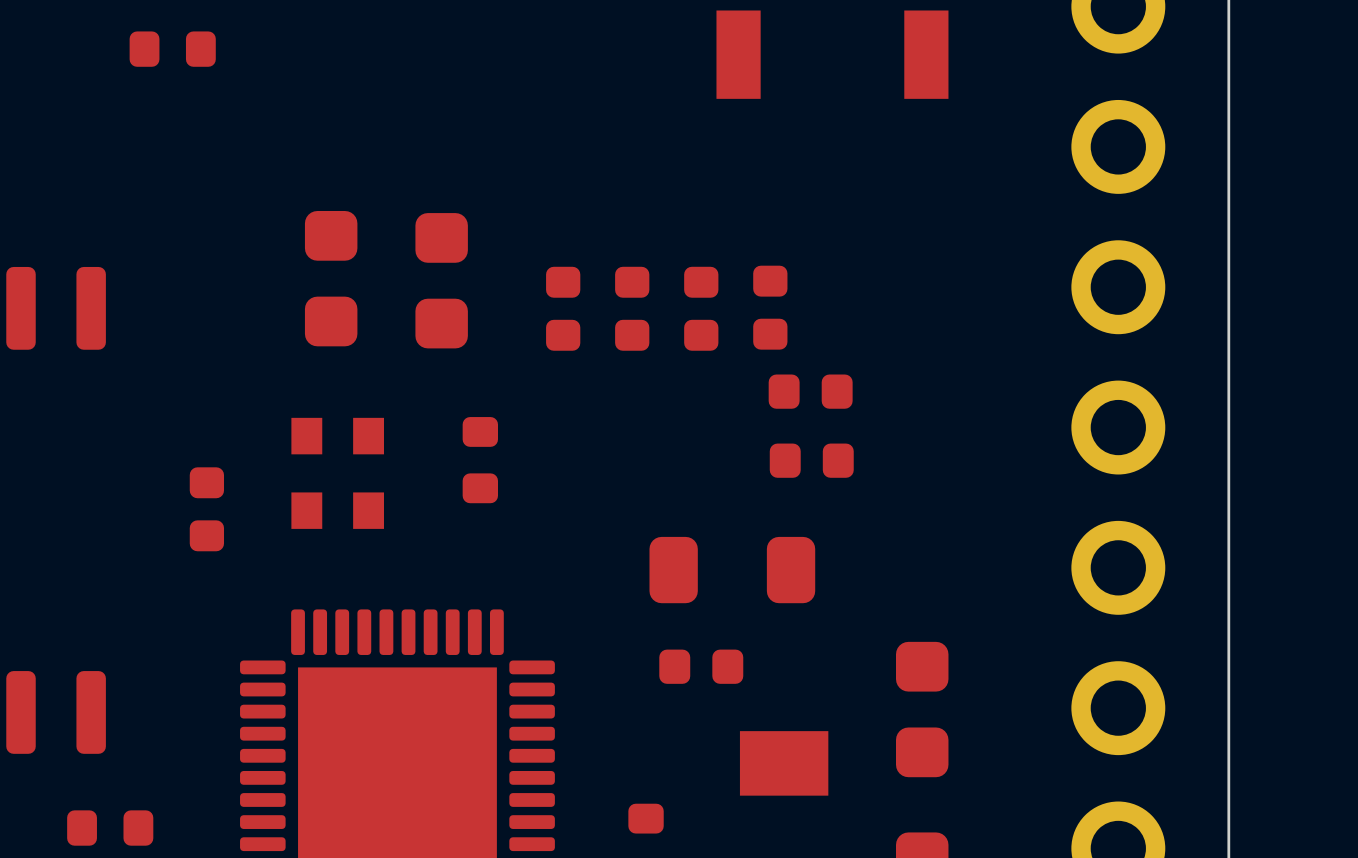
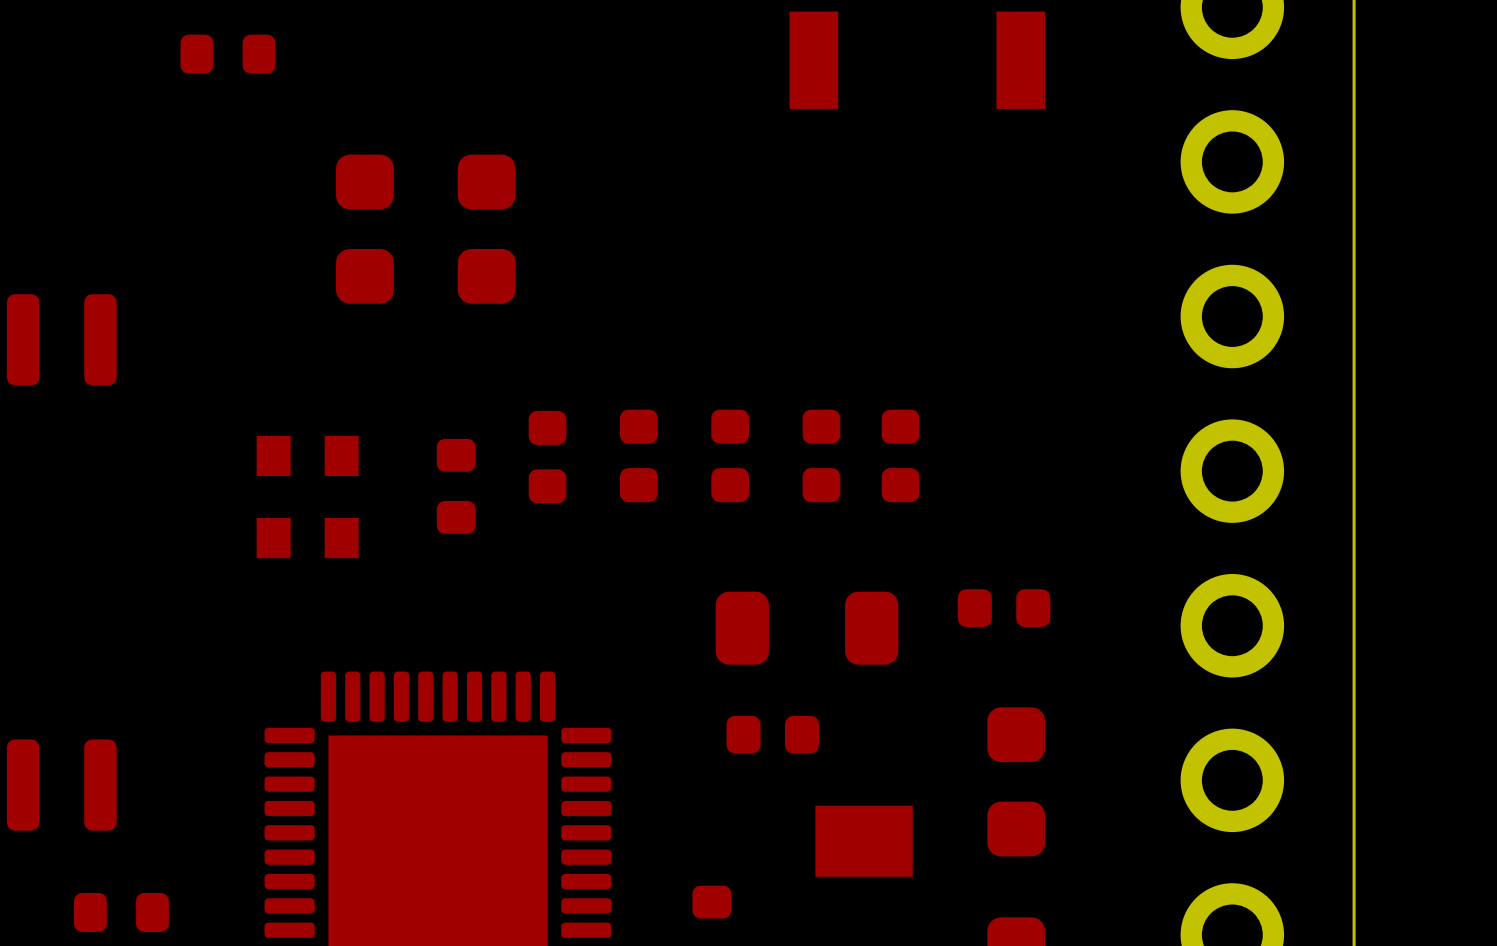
part position: (172, 49) -> (227, 54)
part: none -> (364, 229)
part: none -> (486, 229)
part: (331, 278) -> none
part: (441, 280) -> none
part: (770, 307) -> none
part: (563, 308) -> none
part: (632, 308) -> none
part: (701, 308) -> none
part rotation: 0° (810, 391) -> 90° clockwise (900, 455)
part: none -> (638, 455)
part: none -> (730, 455)
part: none -> (821, 455)
part: none -> (547, 457)
part position: (480, 460) -> (456, 486)
part: (811, 460) -> none
part position: (337, 473) -> (307, 496)
part: (206, 509) -> none
part: none -> (1004, 608)

